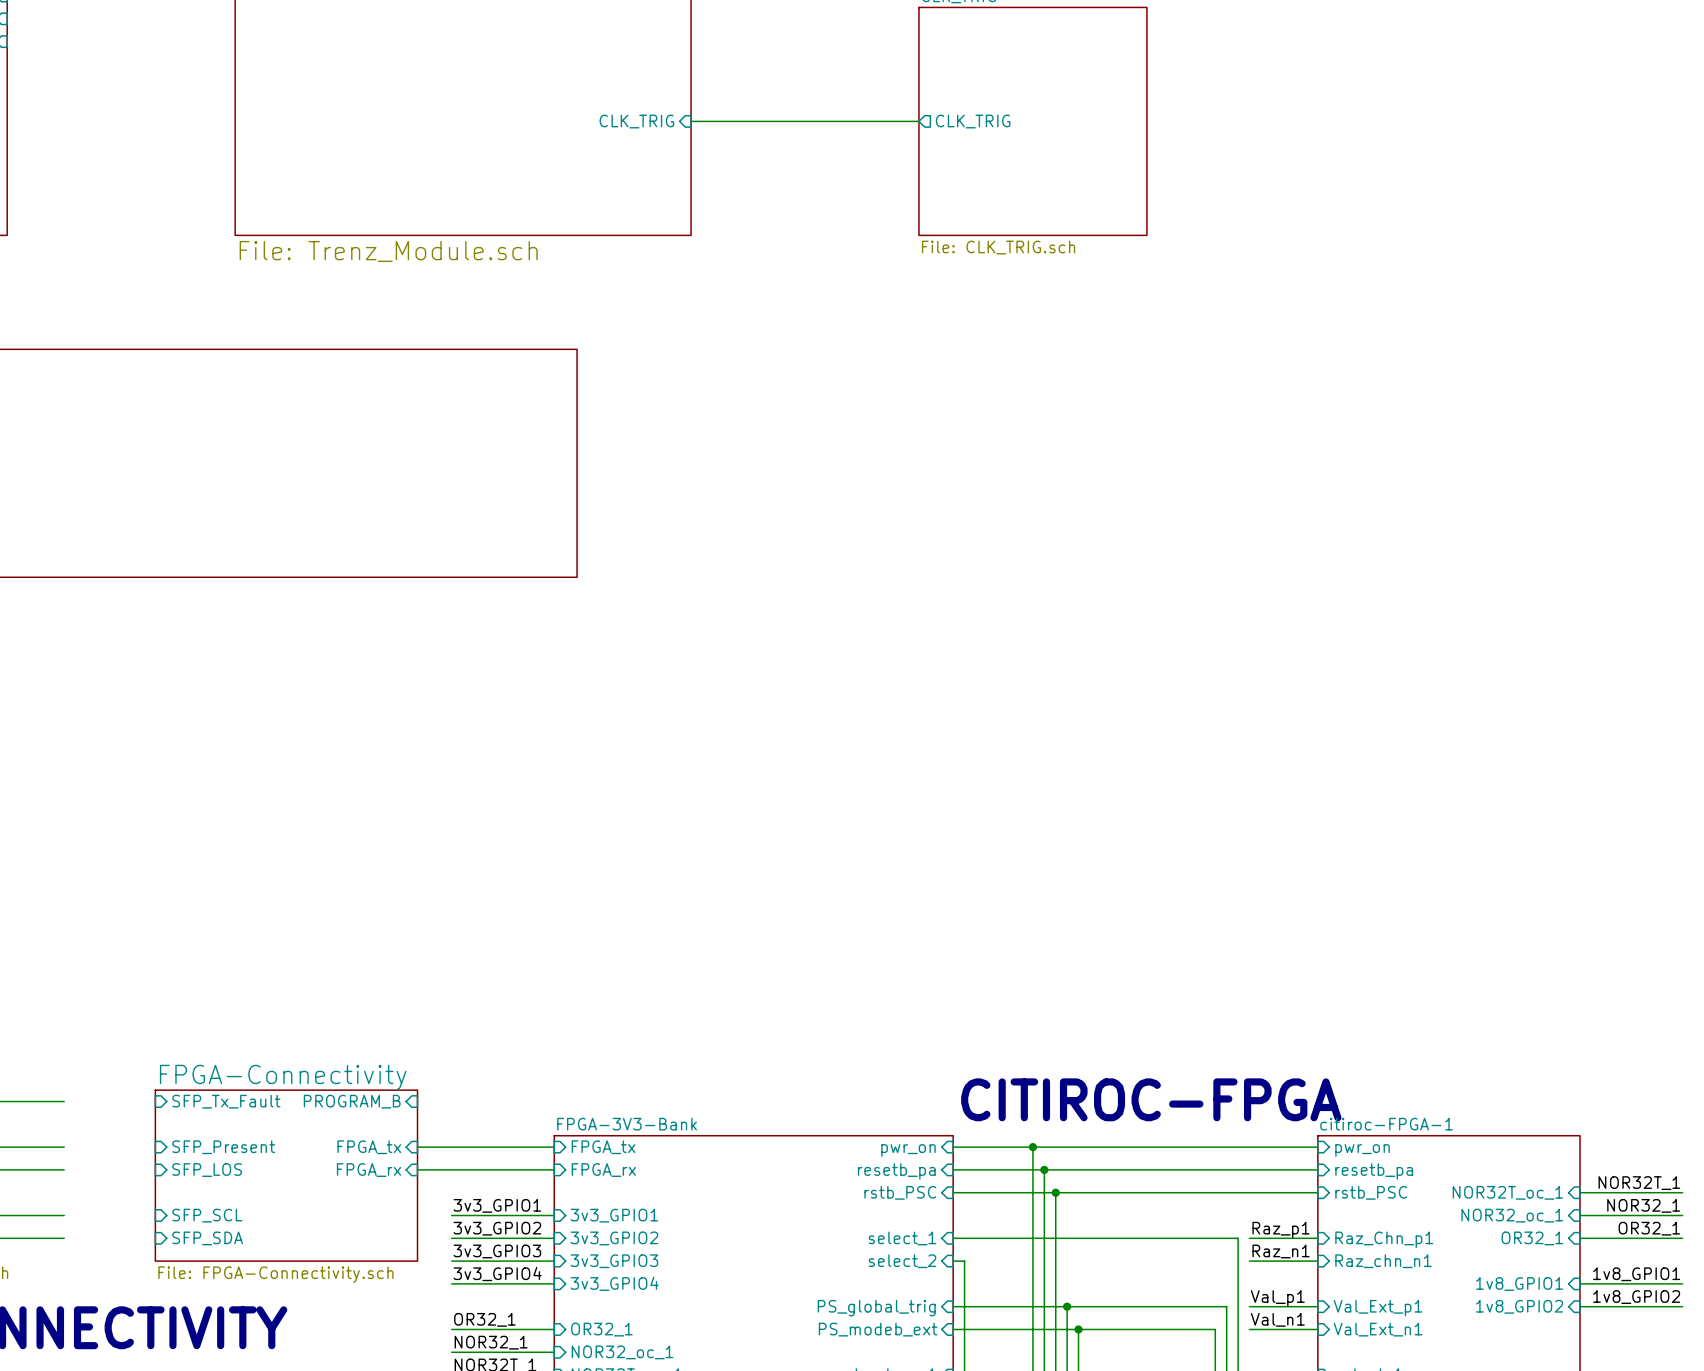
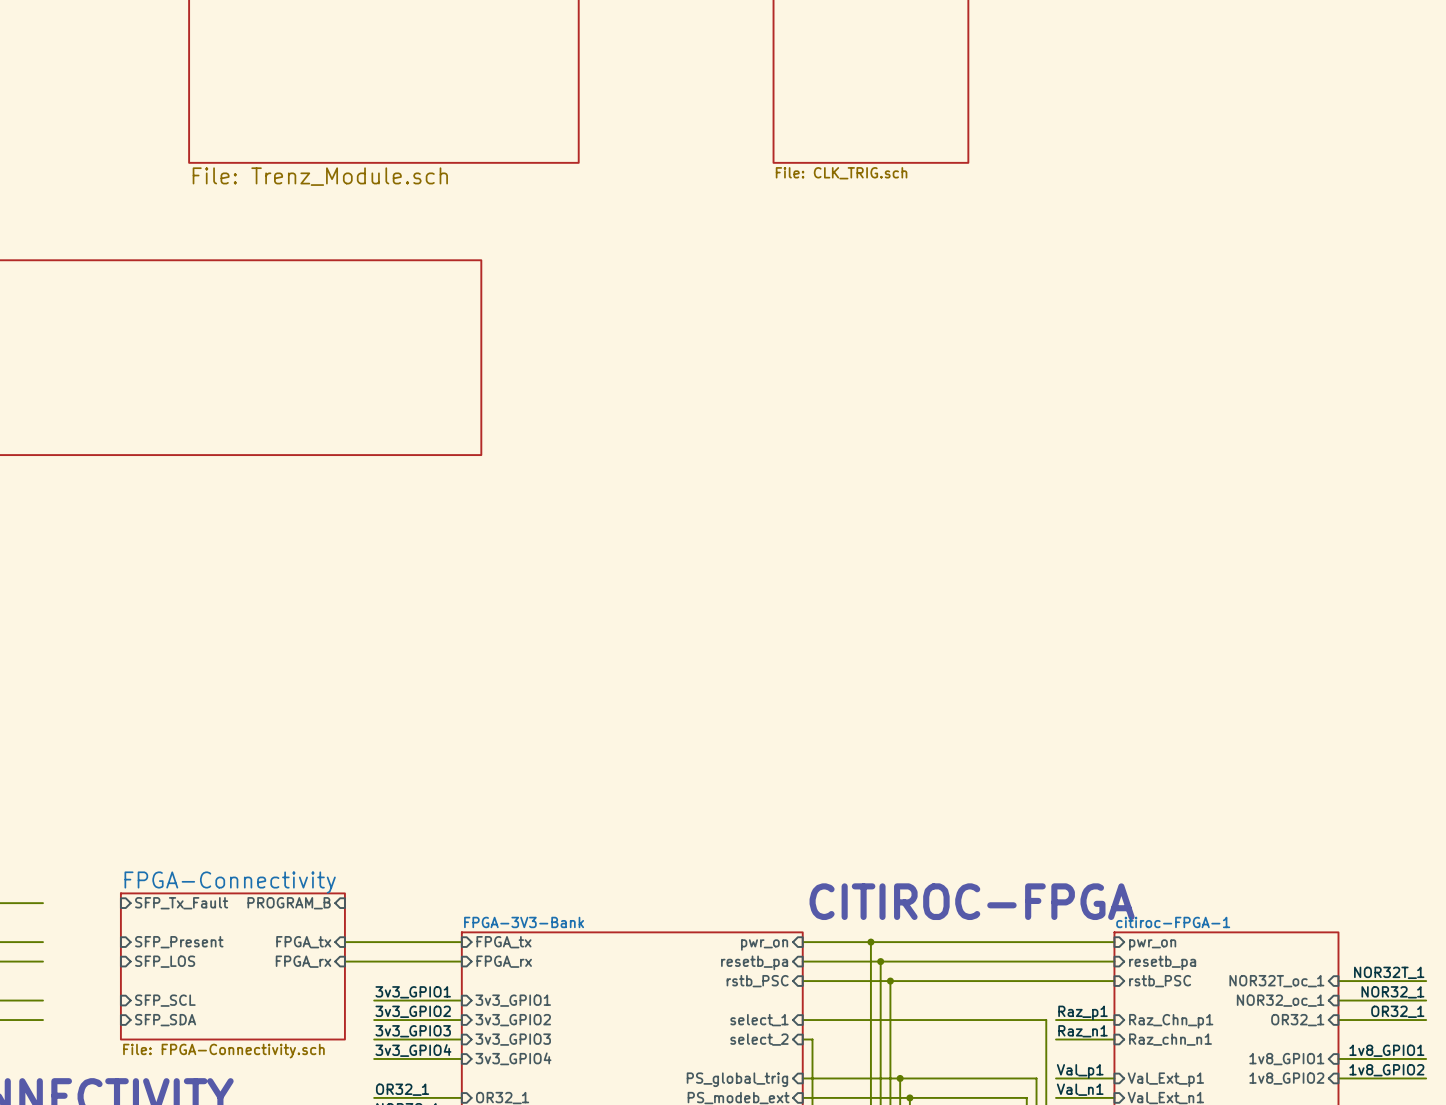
sheet pin: CLK_TRIG (636, 121) -> none
wire: (691, 121) (918, 121) -> none
sheet pin: CLK_TRIG (973, 121) -> none

